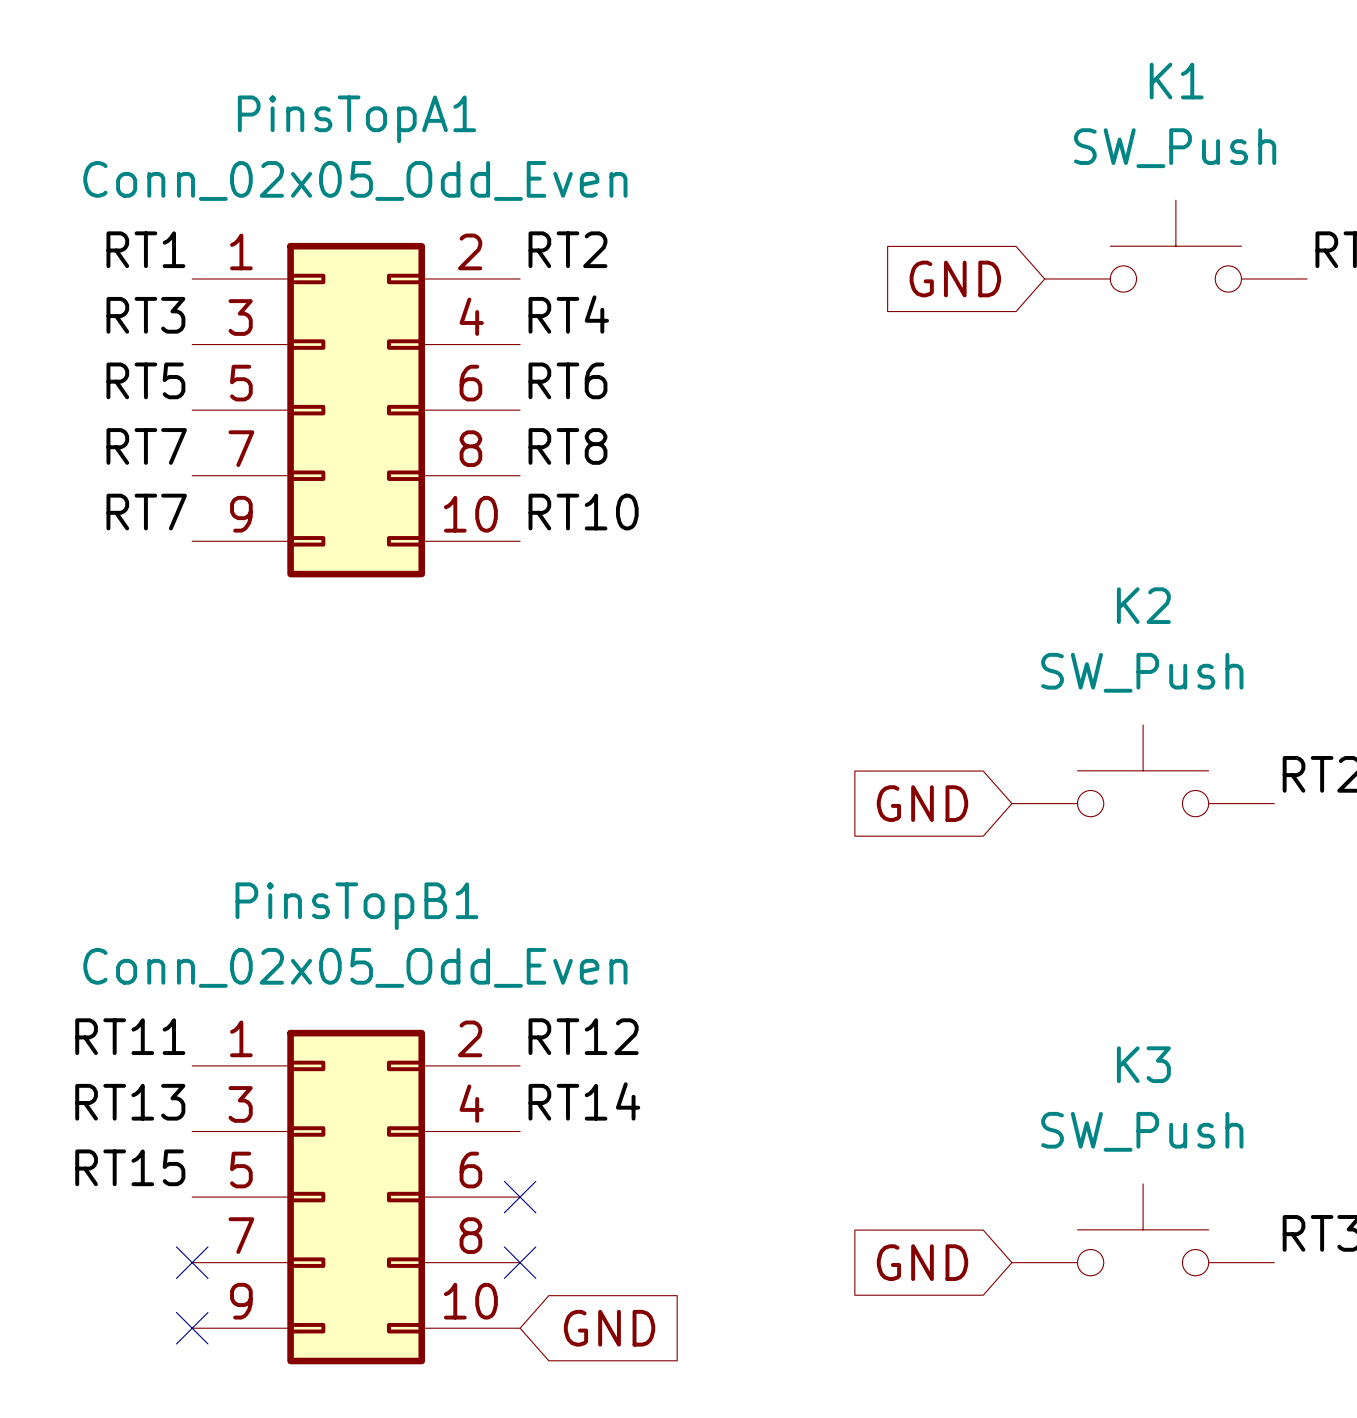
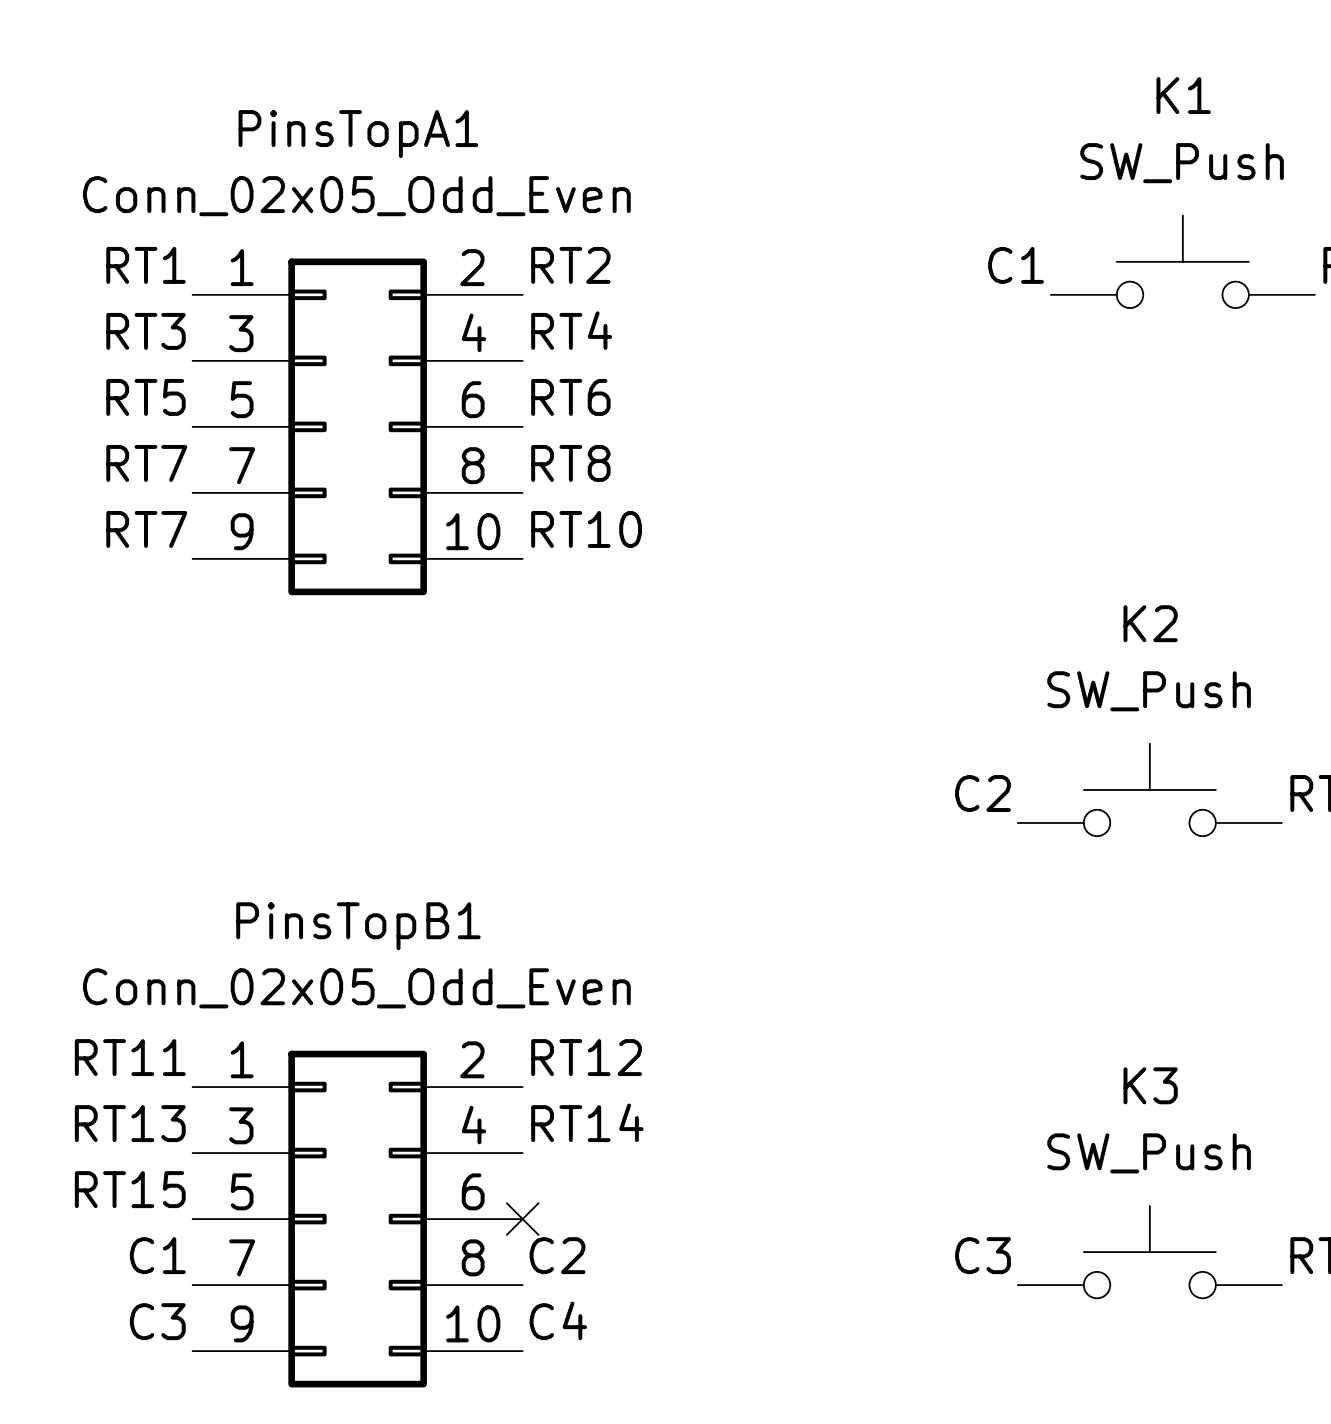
label: none -> C1 (1015, 265)
global label: GND (955, 278) -> none
label: none -> C2 (982, 793)
global label: GND (922, 803) -> none
label: none -> C1 (157, 1255)
label: none -> C2 (557, 1255)
label: none -> C3 (982, 1255)
no-connect mark: (192, 1262) -> none
no-connect mark: (520, 1262) -> none
global label: GND (922, 1262) -> none
label: none -> C3 (157, 1321)
label: none -> C4 (558, 1320)
no-connect mark: (192, 1328) -> none
global label: GND (609, 1328) -> none

